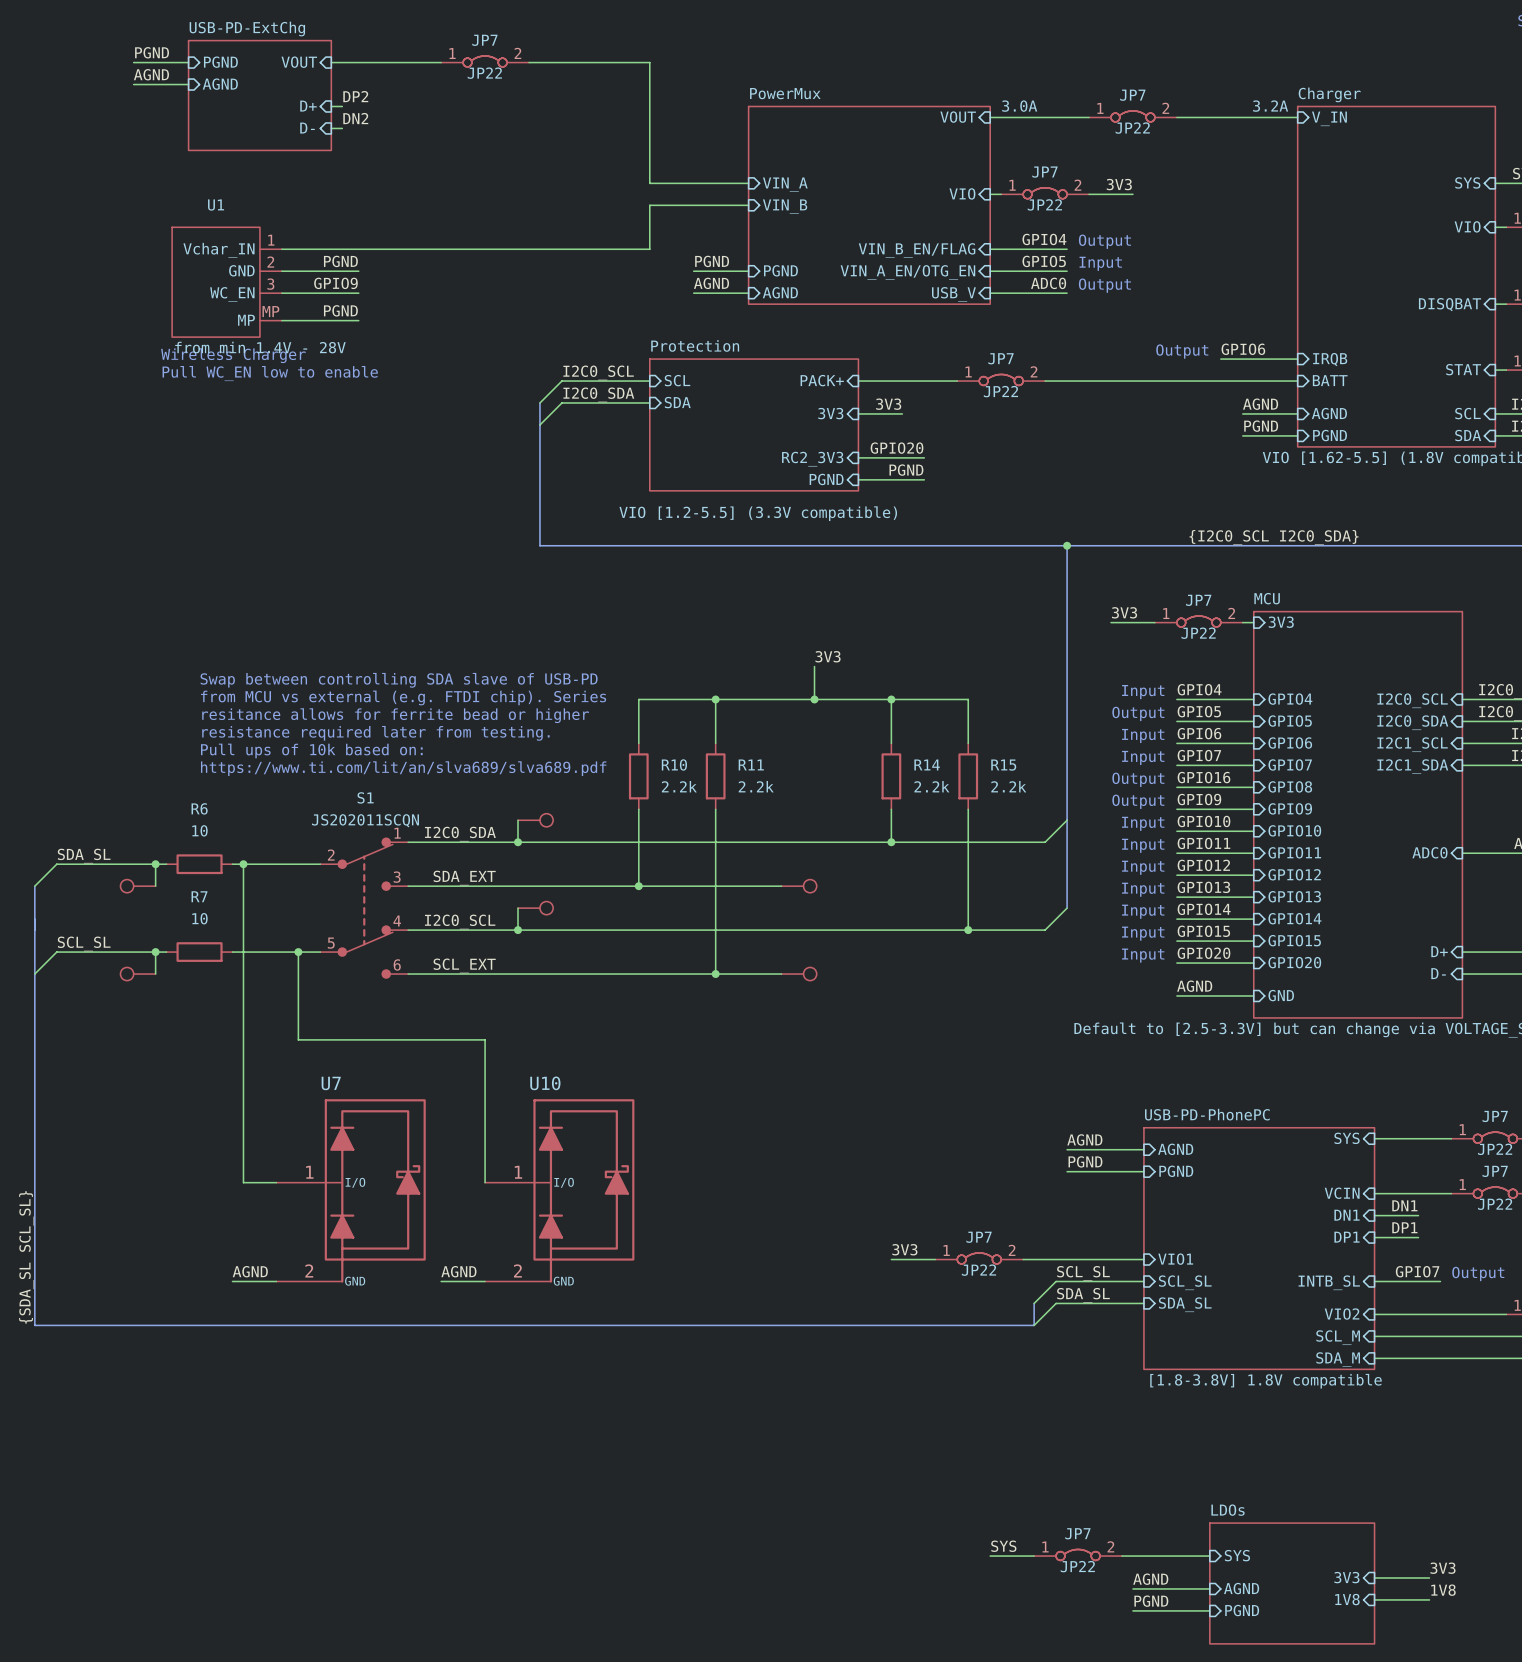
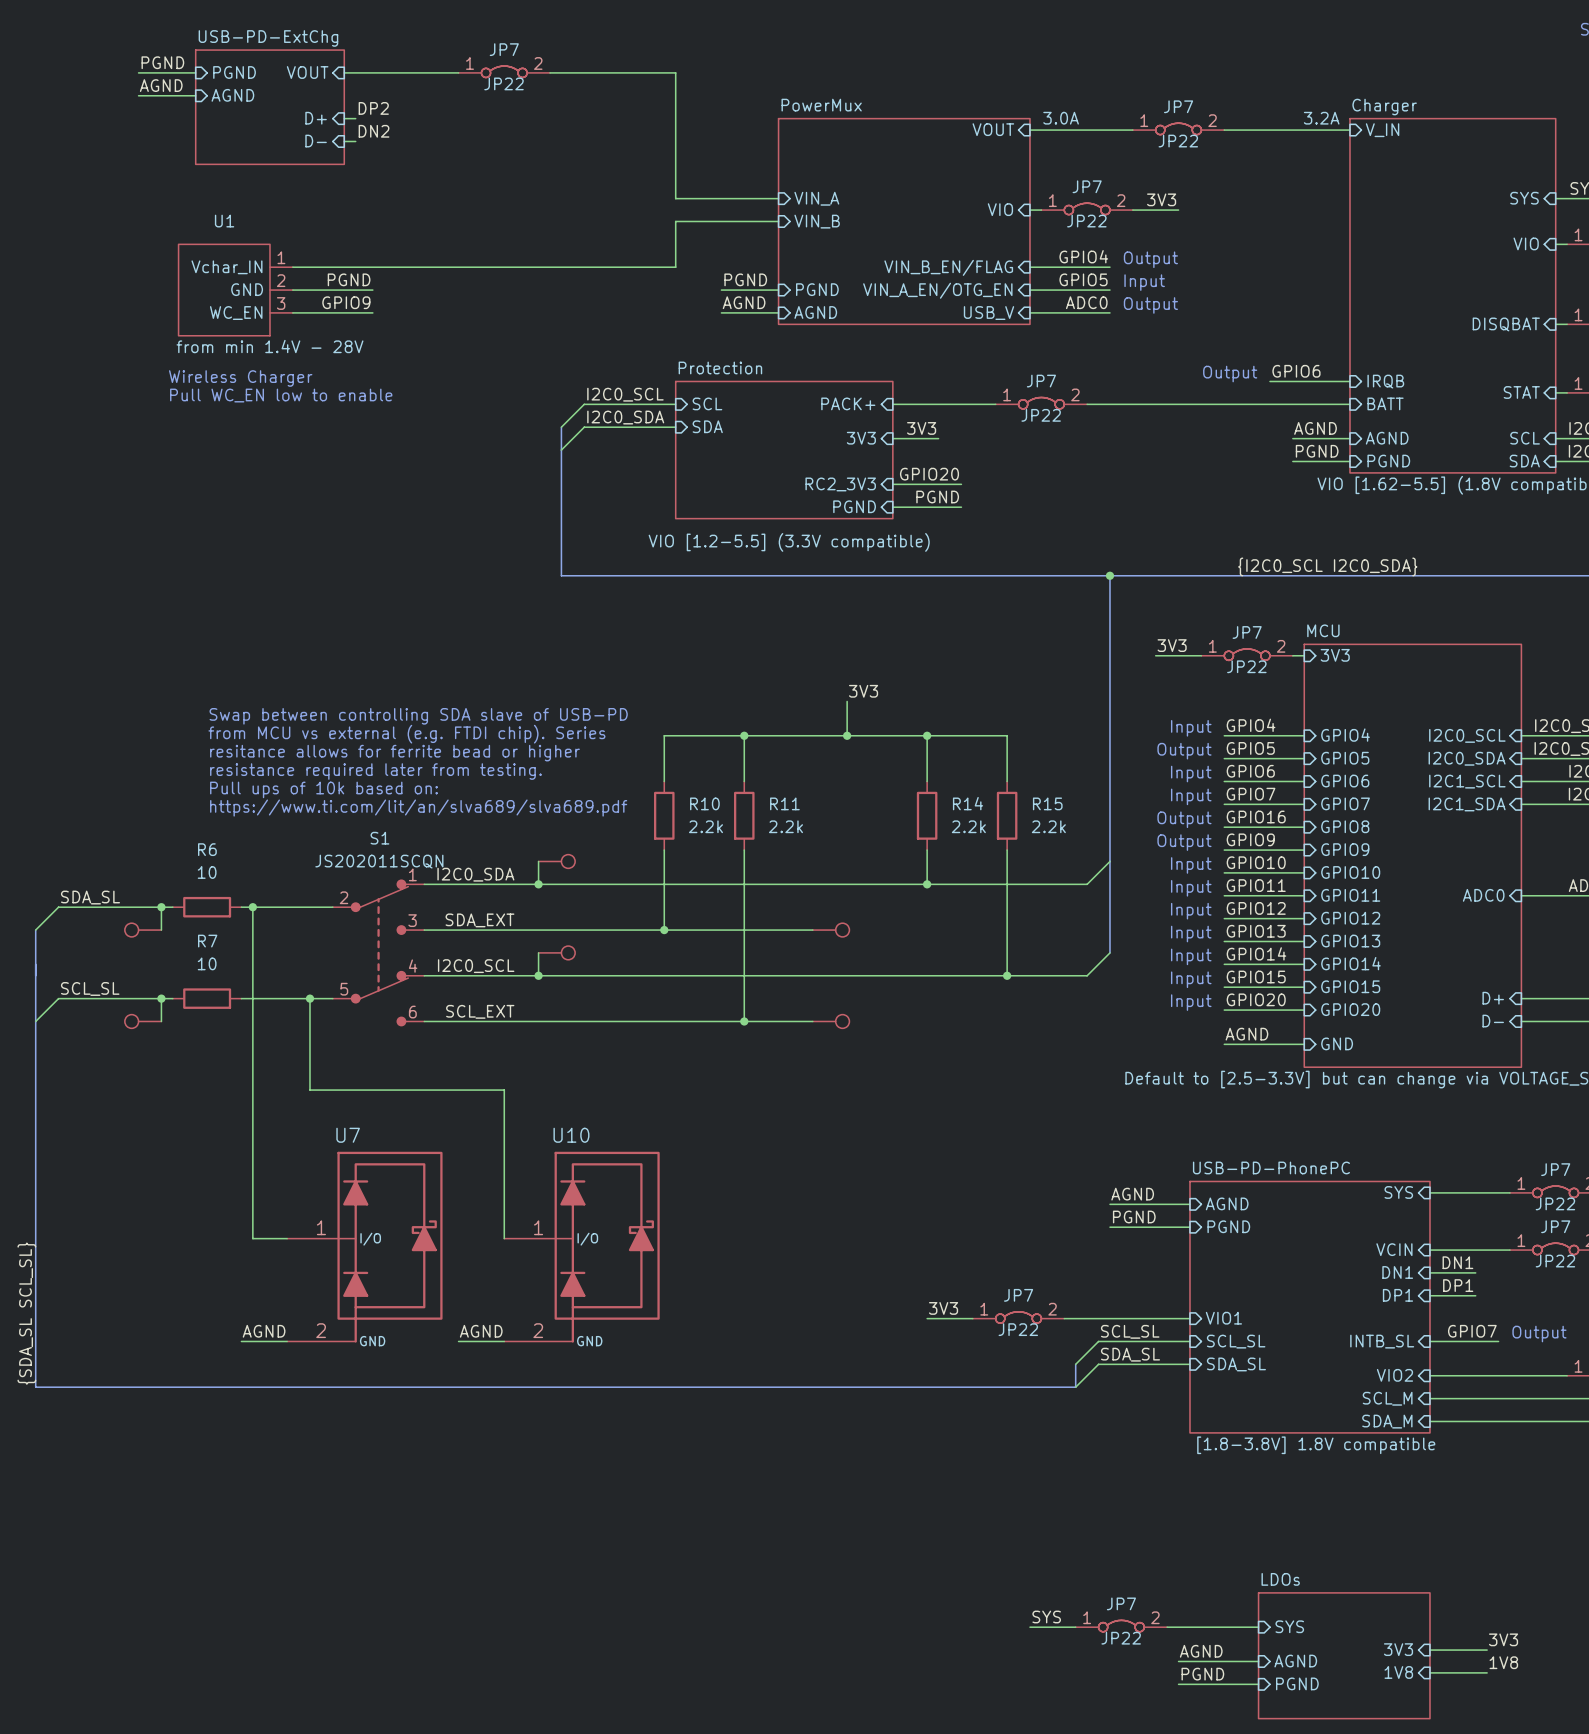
U1 symbol: [172, 227, 282, 338] -> [178, 244, 293, 336]
label: PGND (340, 310) -> none
wire: (281, 320) (358, 320) -> none

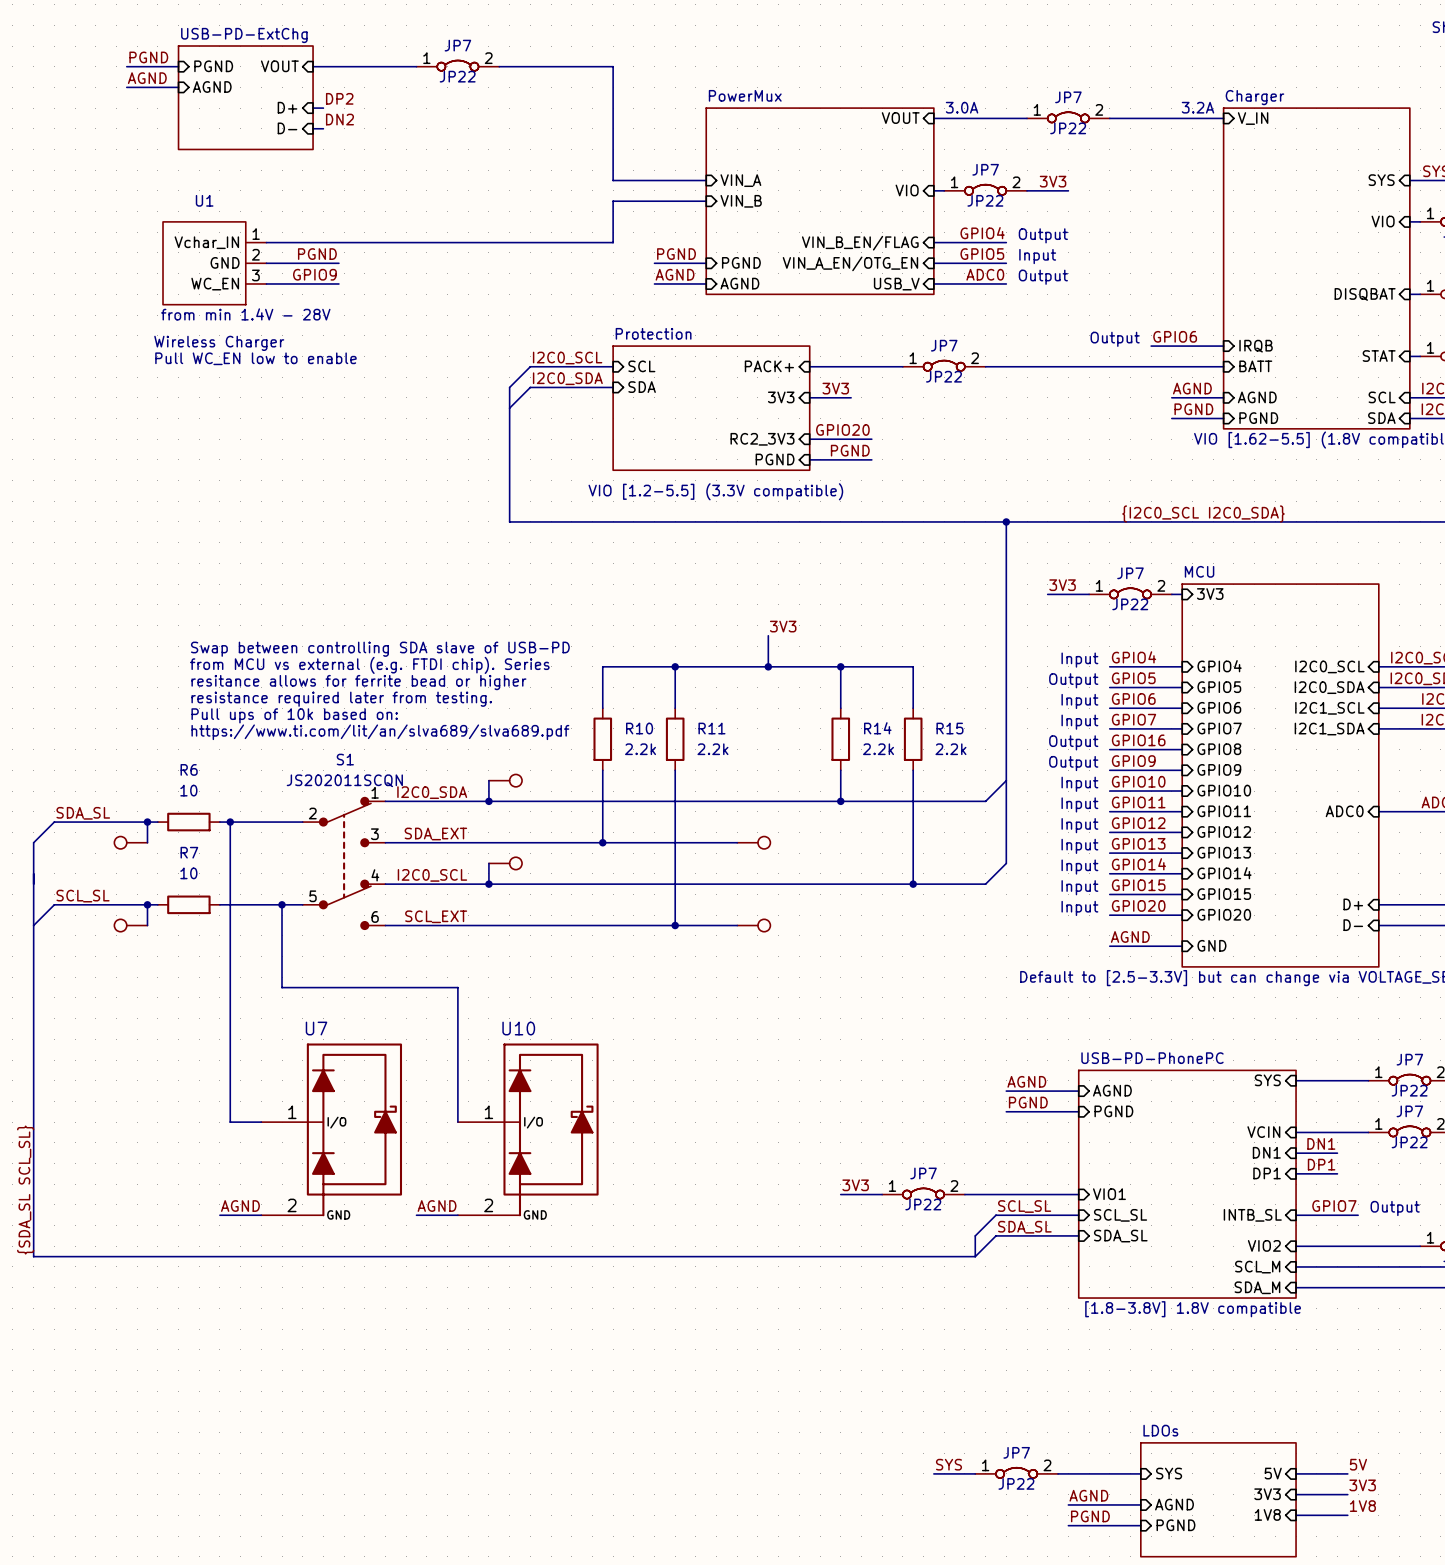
label: none -> 5V (1358, 1464)
sheet pin: none -> 5V (1273, 1473)
wire: none -> (1296, 1473) (1347, 1473)

